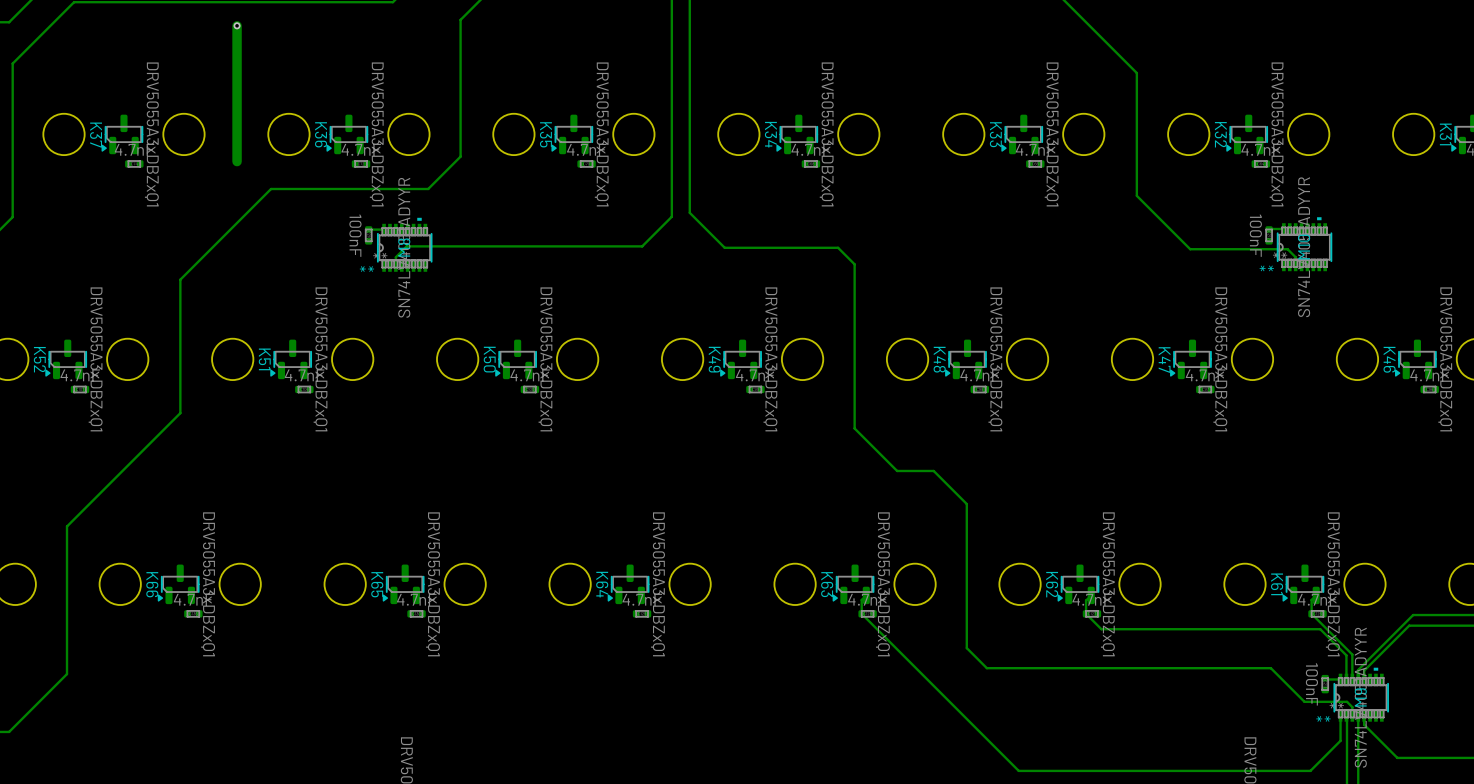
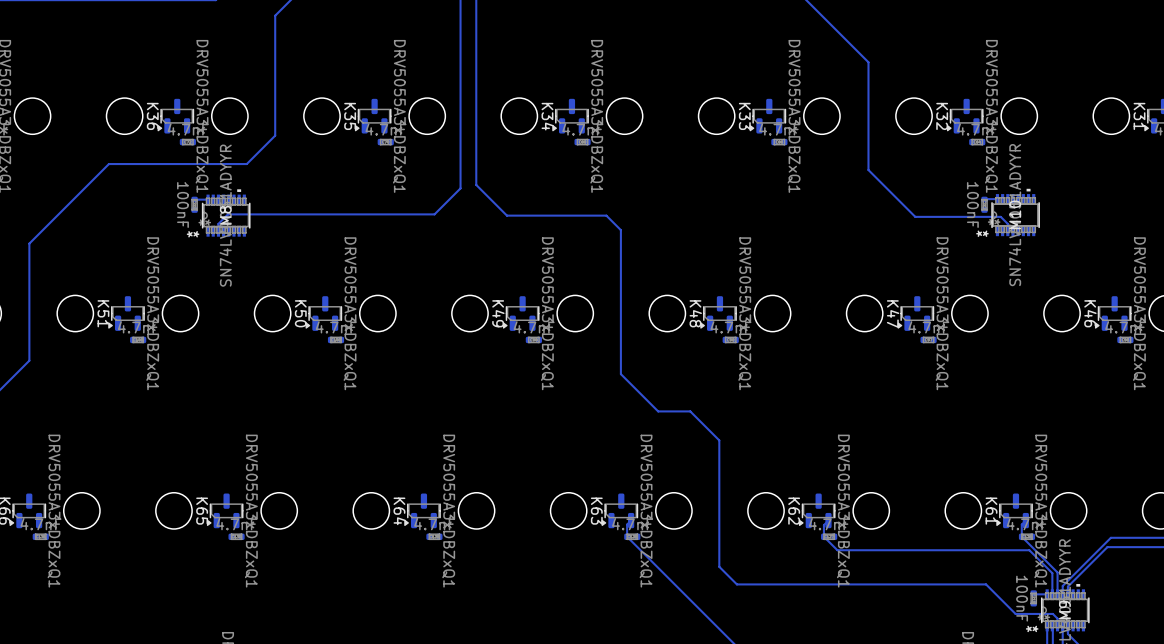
track: (237, 25) (237, 161) -> none
via: (237, 25) -> none

